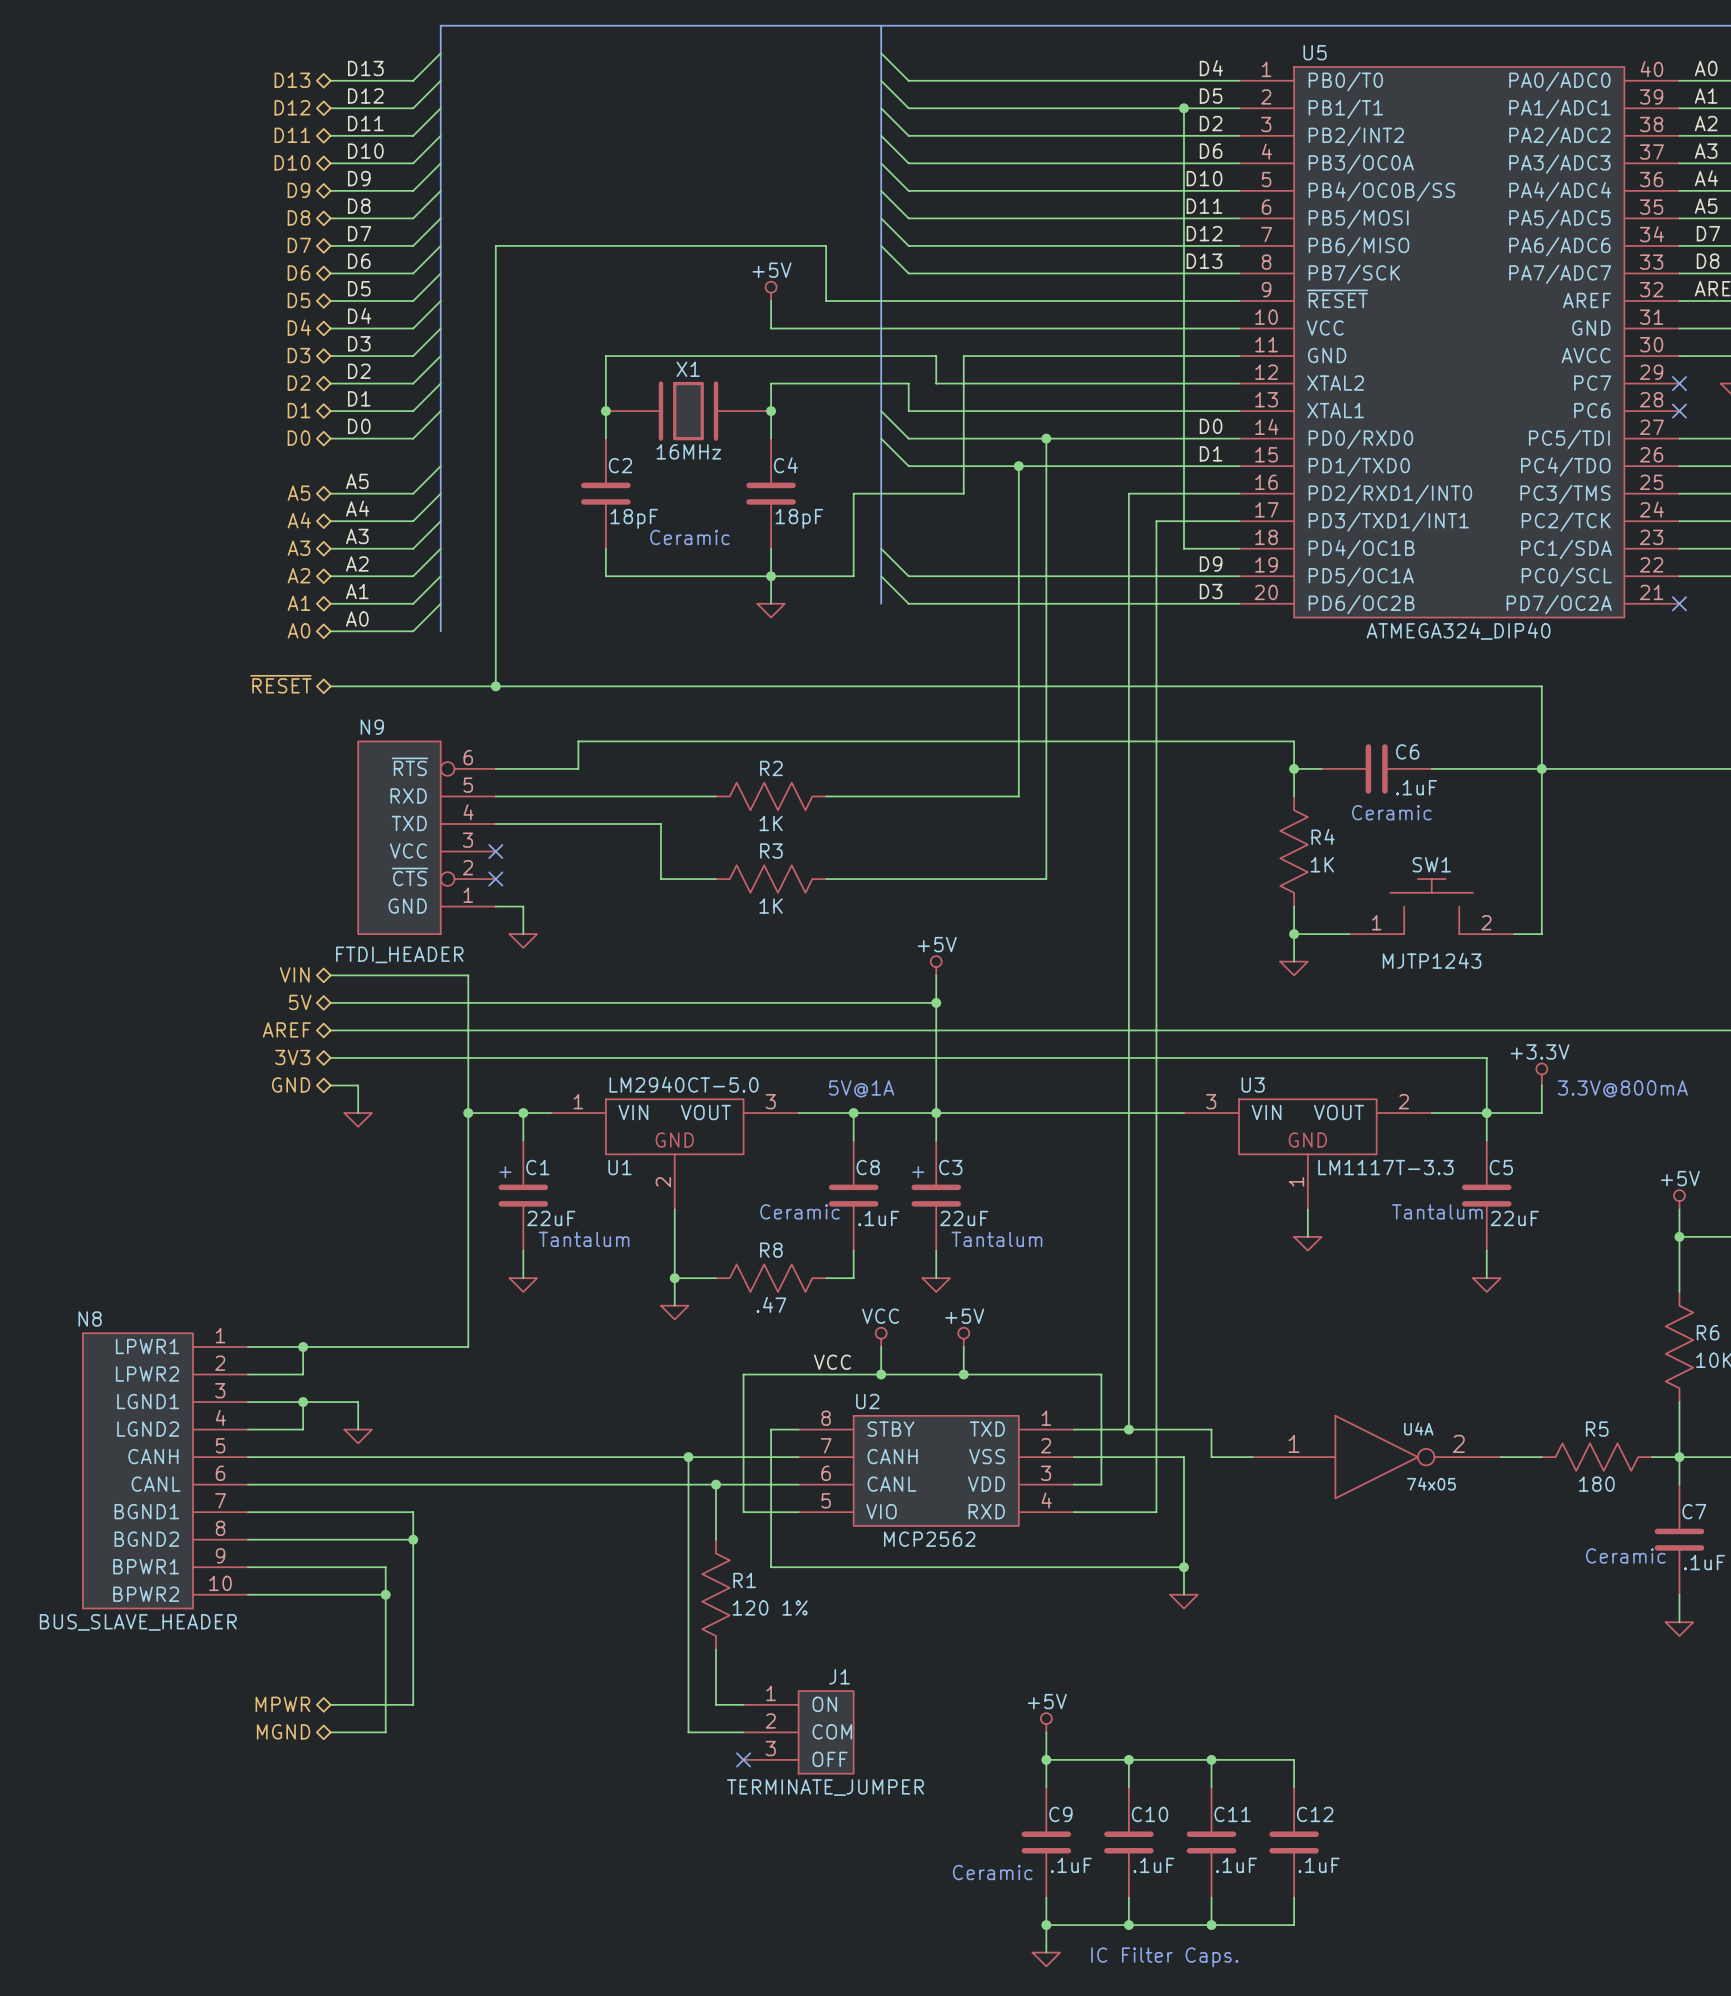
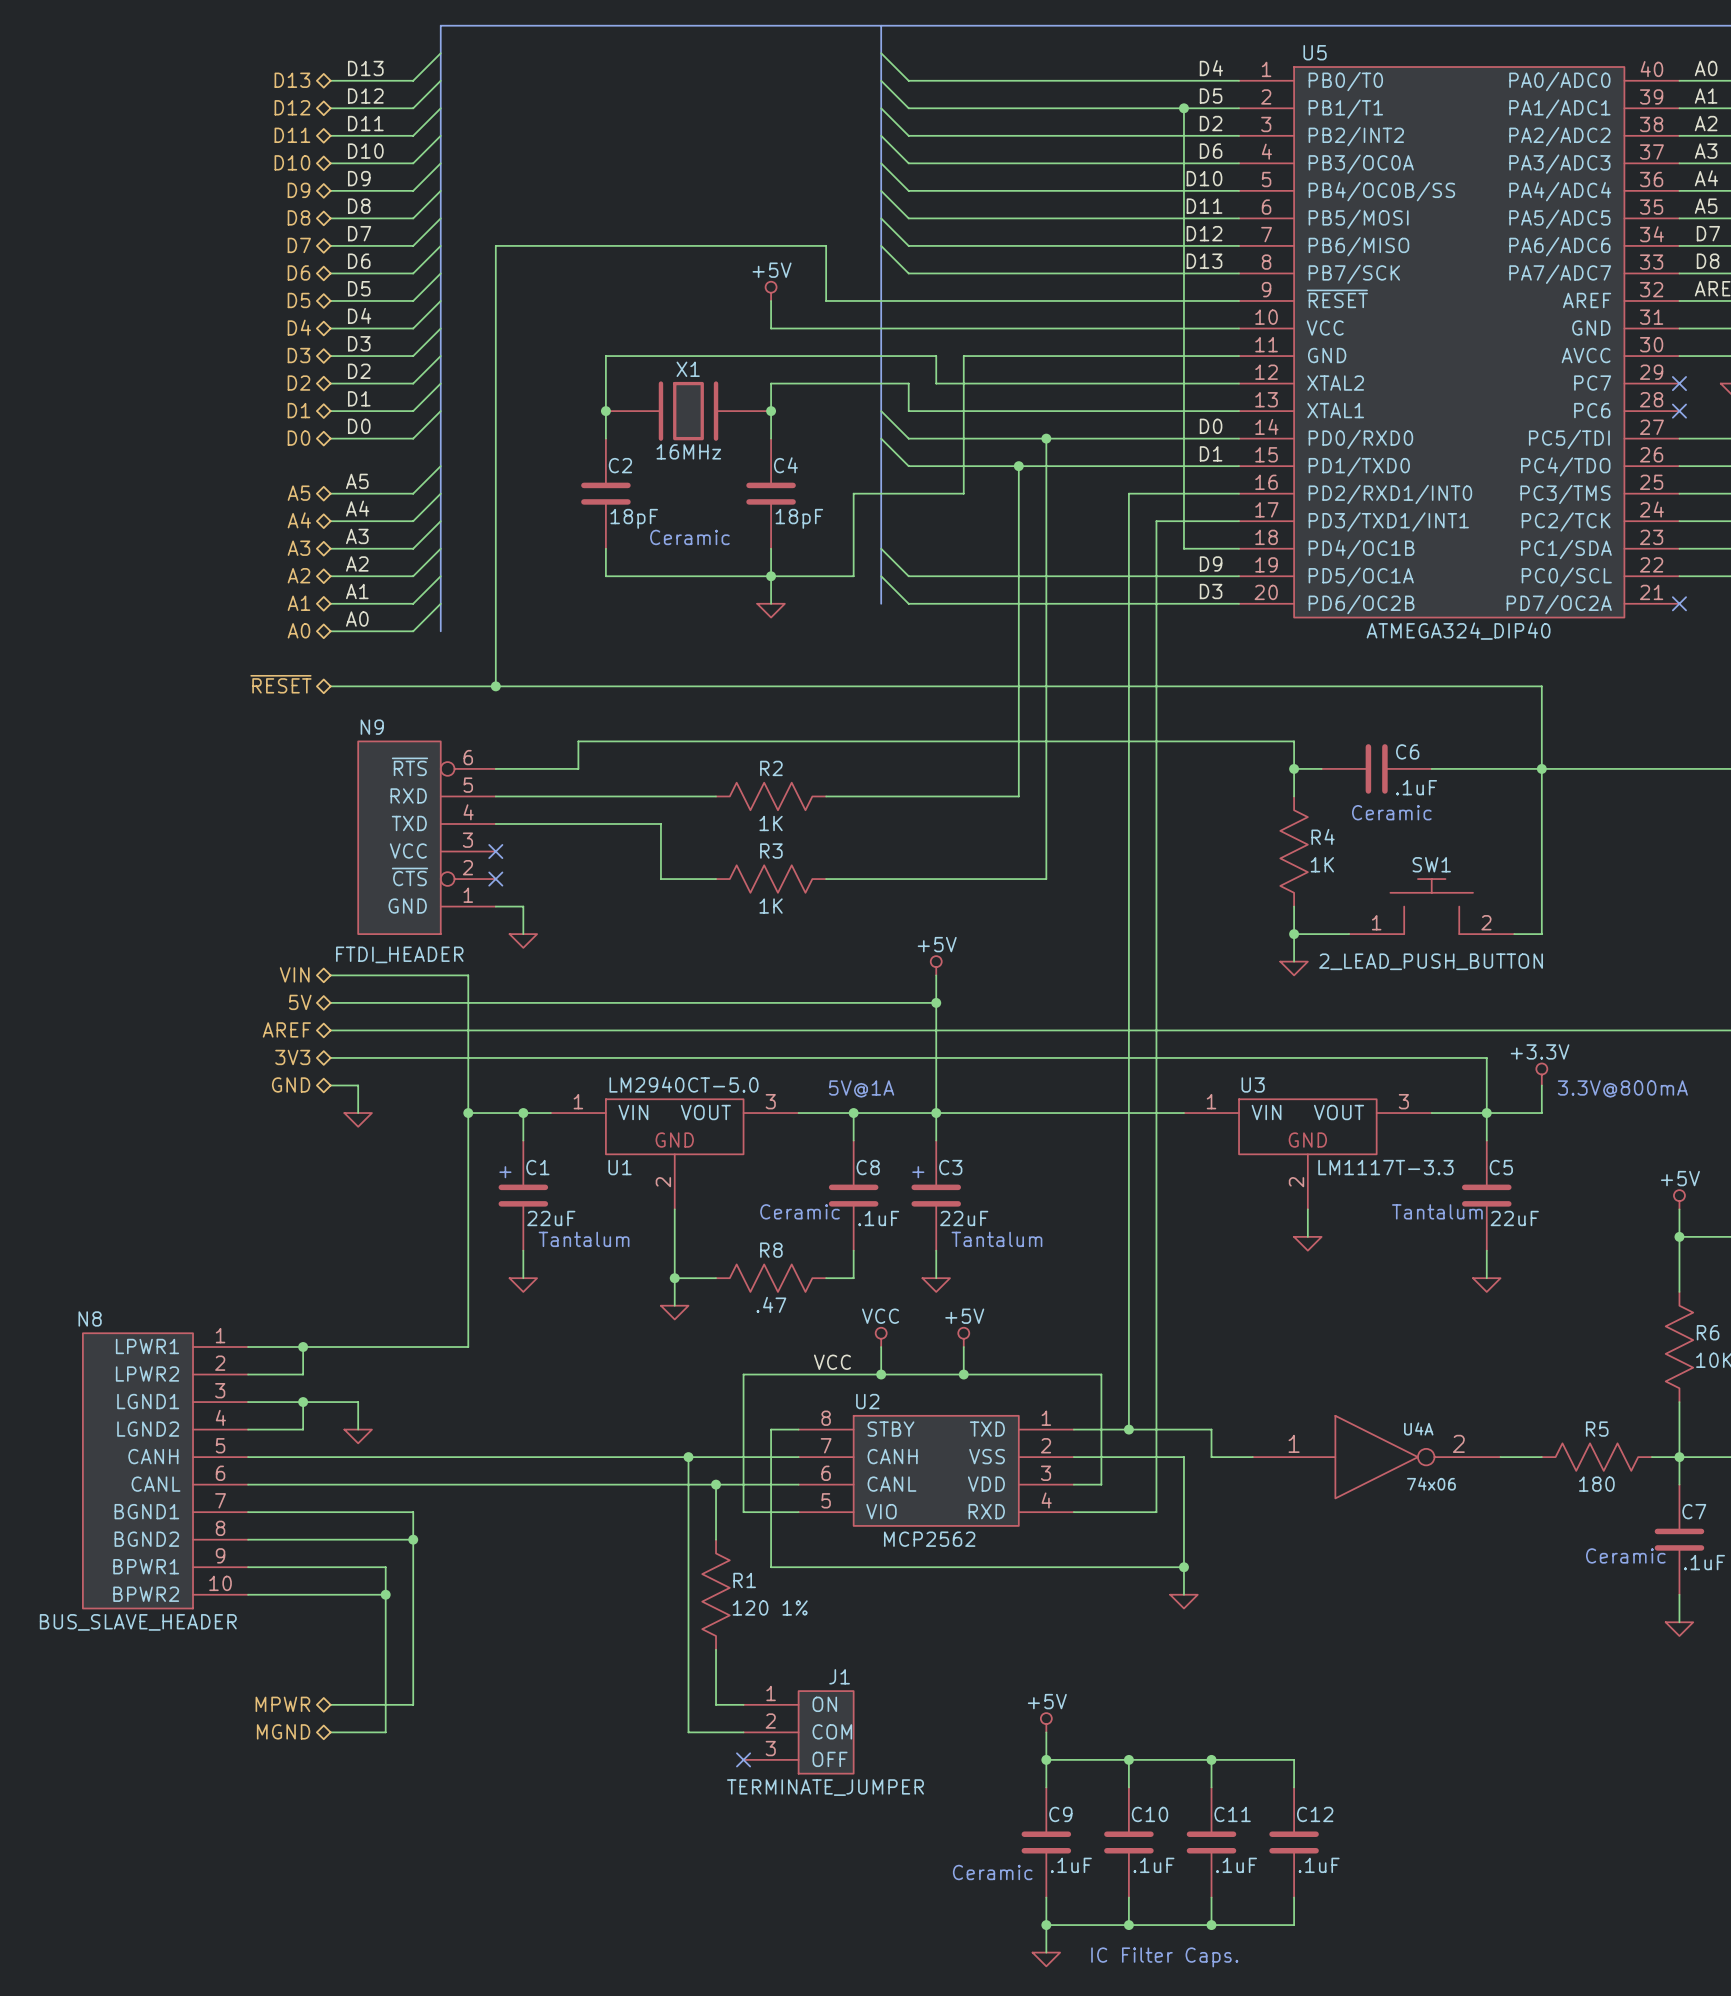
SW1 value: MJTP1243 (1432, 960) -> 2_LEAD_PUSH_BUTTON (1431, 961)
U3 pin number: 3 (1211, 1101) -> 1 (1211, 1101)
U3 pin number: 2 (1403, 1101) -> 3 (1403, 1101)
U3 pin number: 1 (1296, 1181) -> 2 (1296, 1182)
U4A value: 74x05 (1431, 1483) -> 74x06 (1431, 1483)

